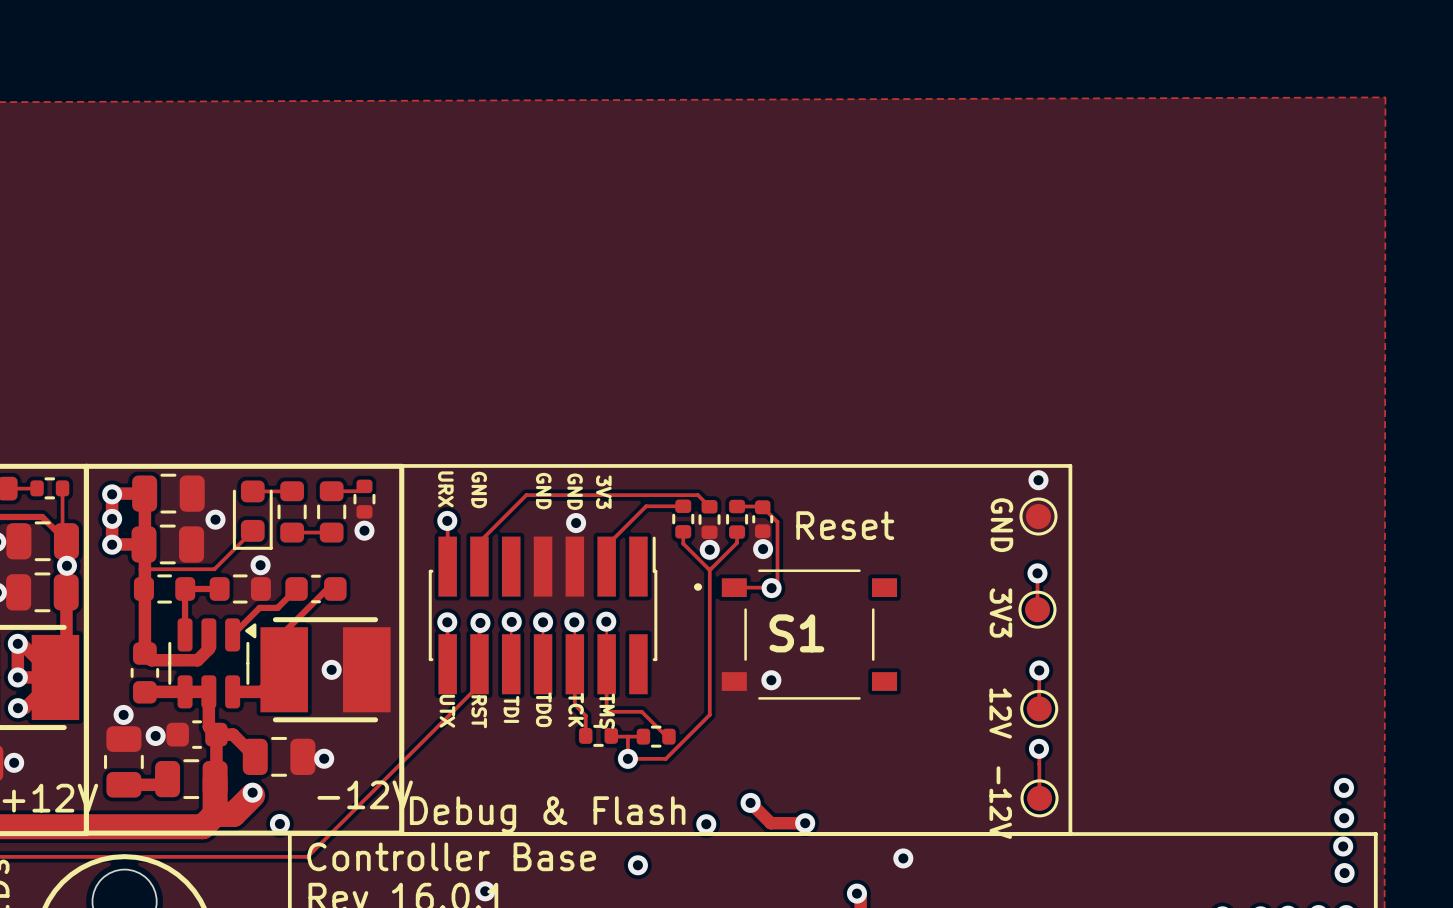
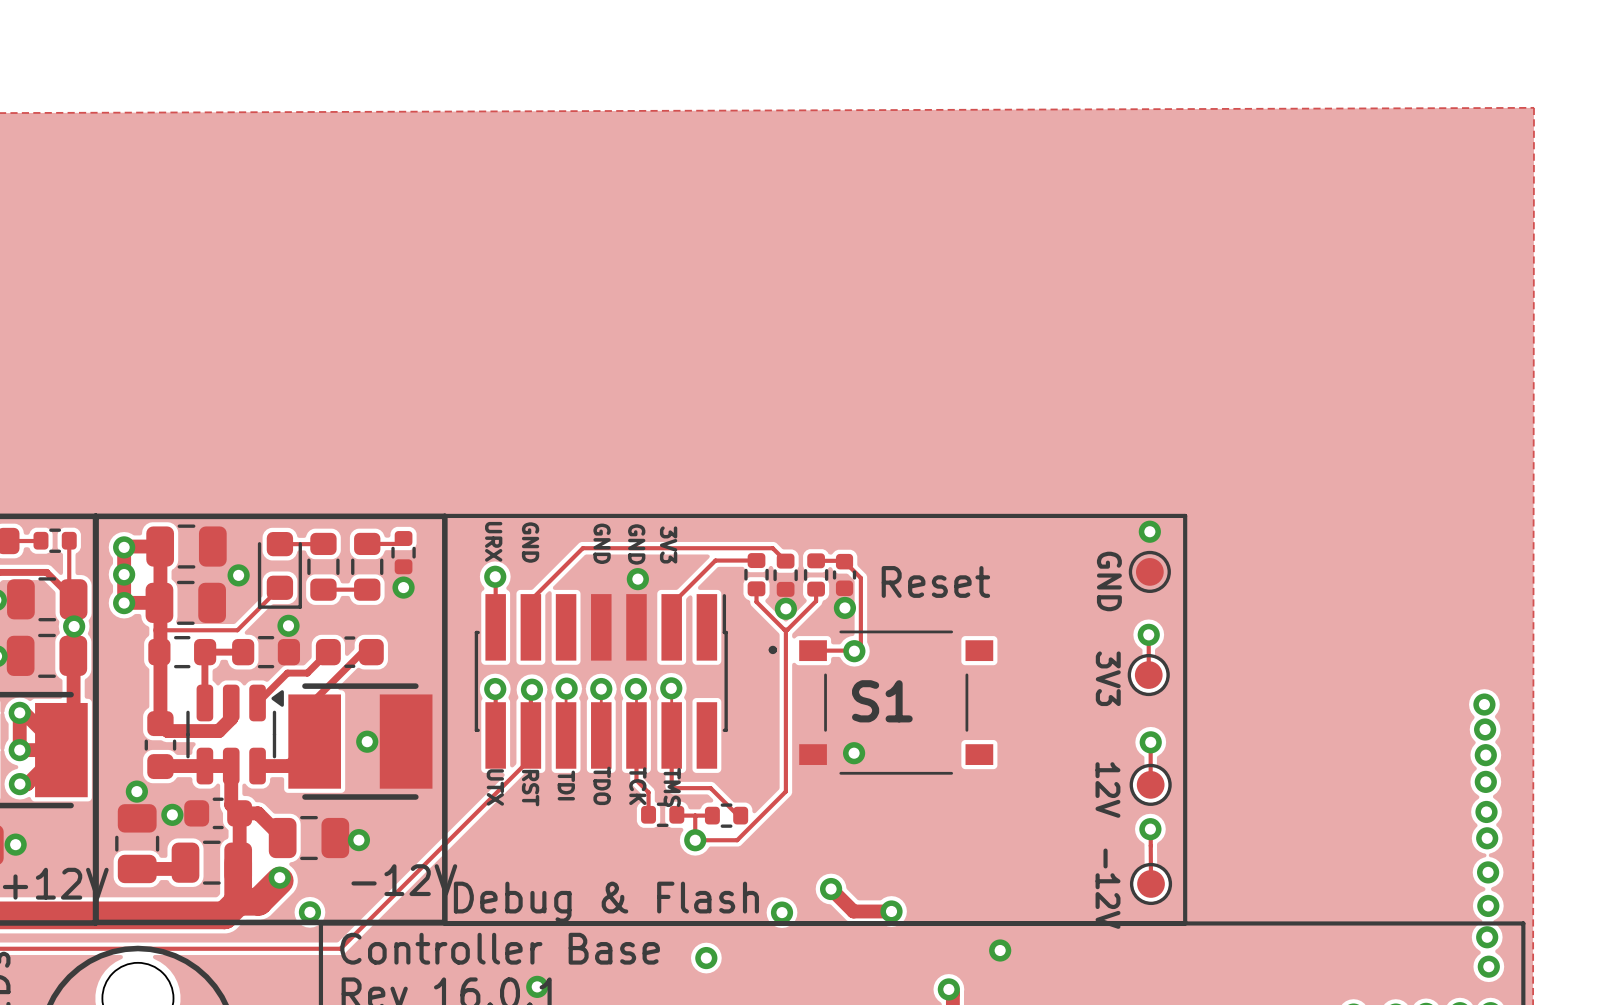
via: none -> (1484, 704)
via: none -> (1485, 729)
via: none -> (1485, 755)
via: none -> (1485, 781)
via: none -> (1486, 811)
via: none -> (1487, 838)

